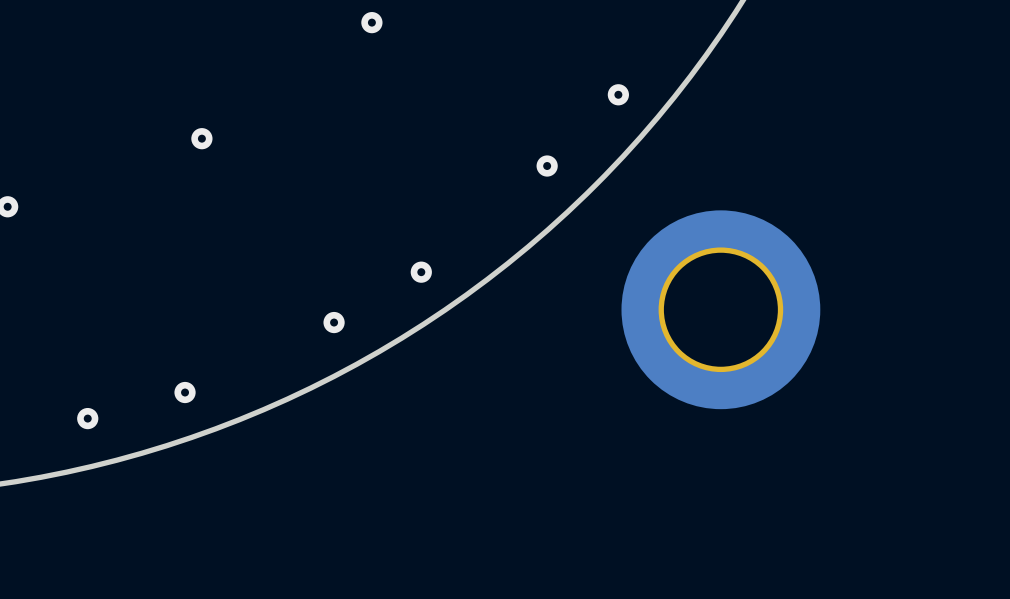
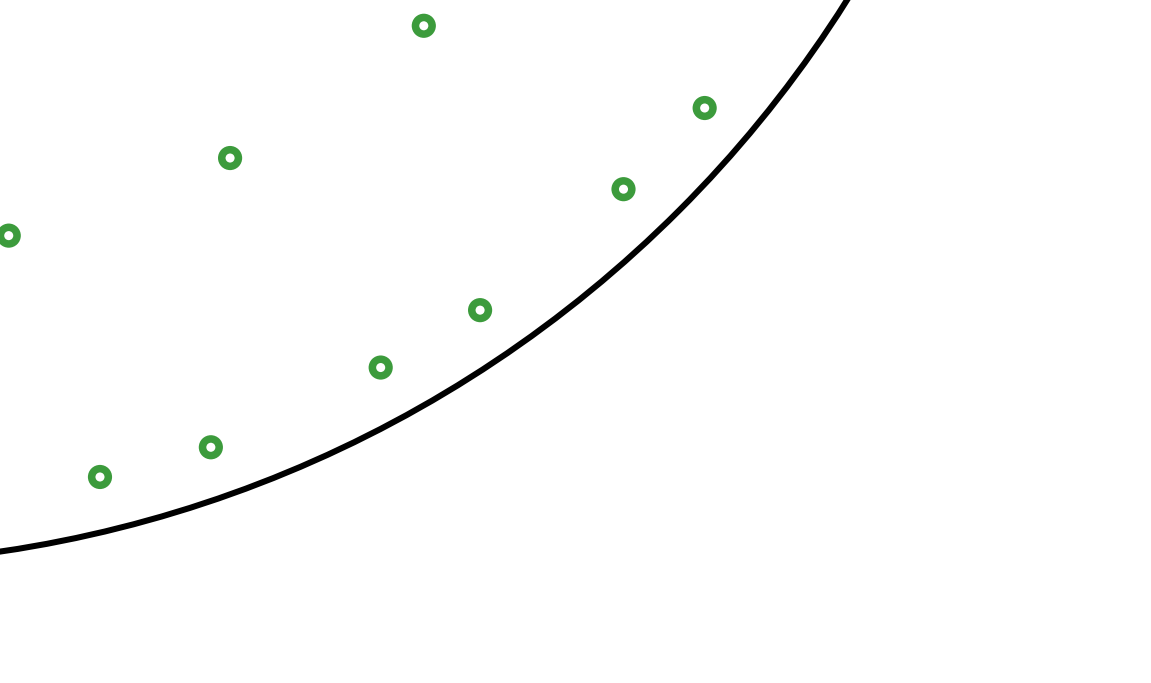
part: (720, 309) -> none

